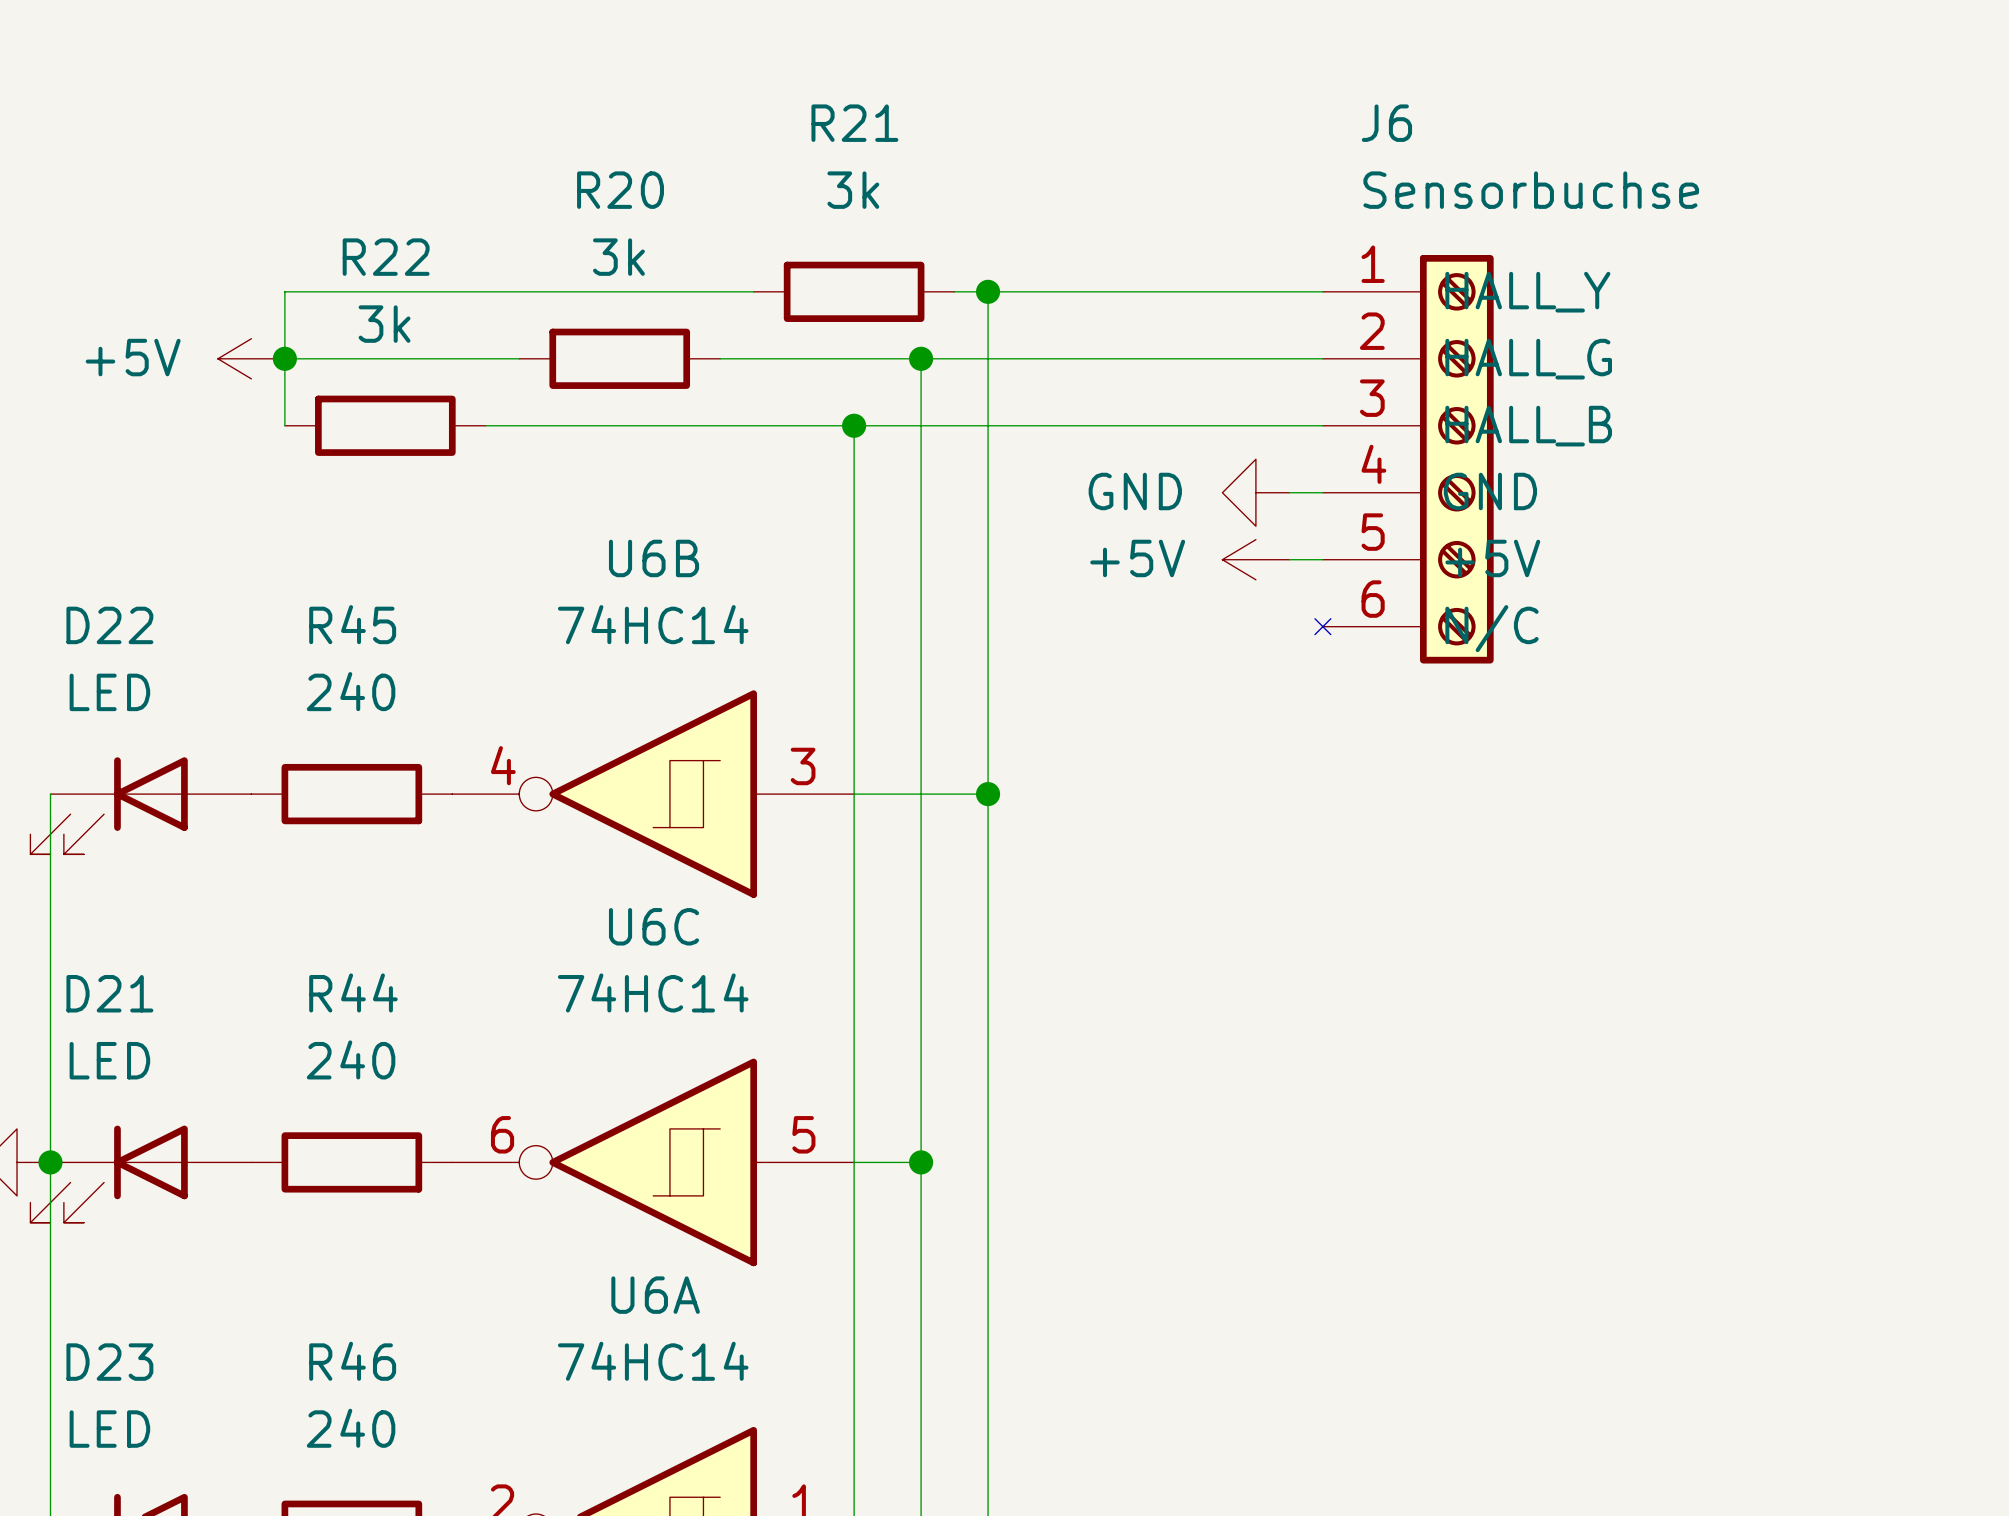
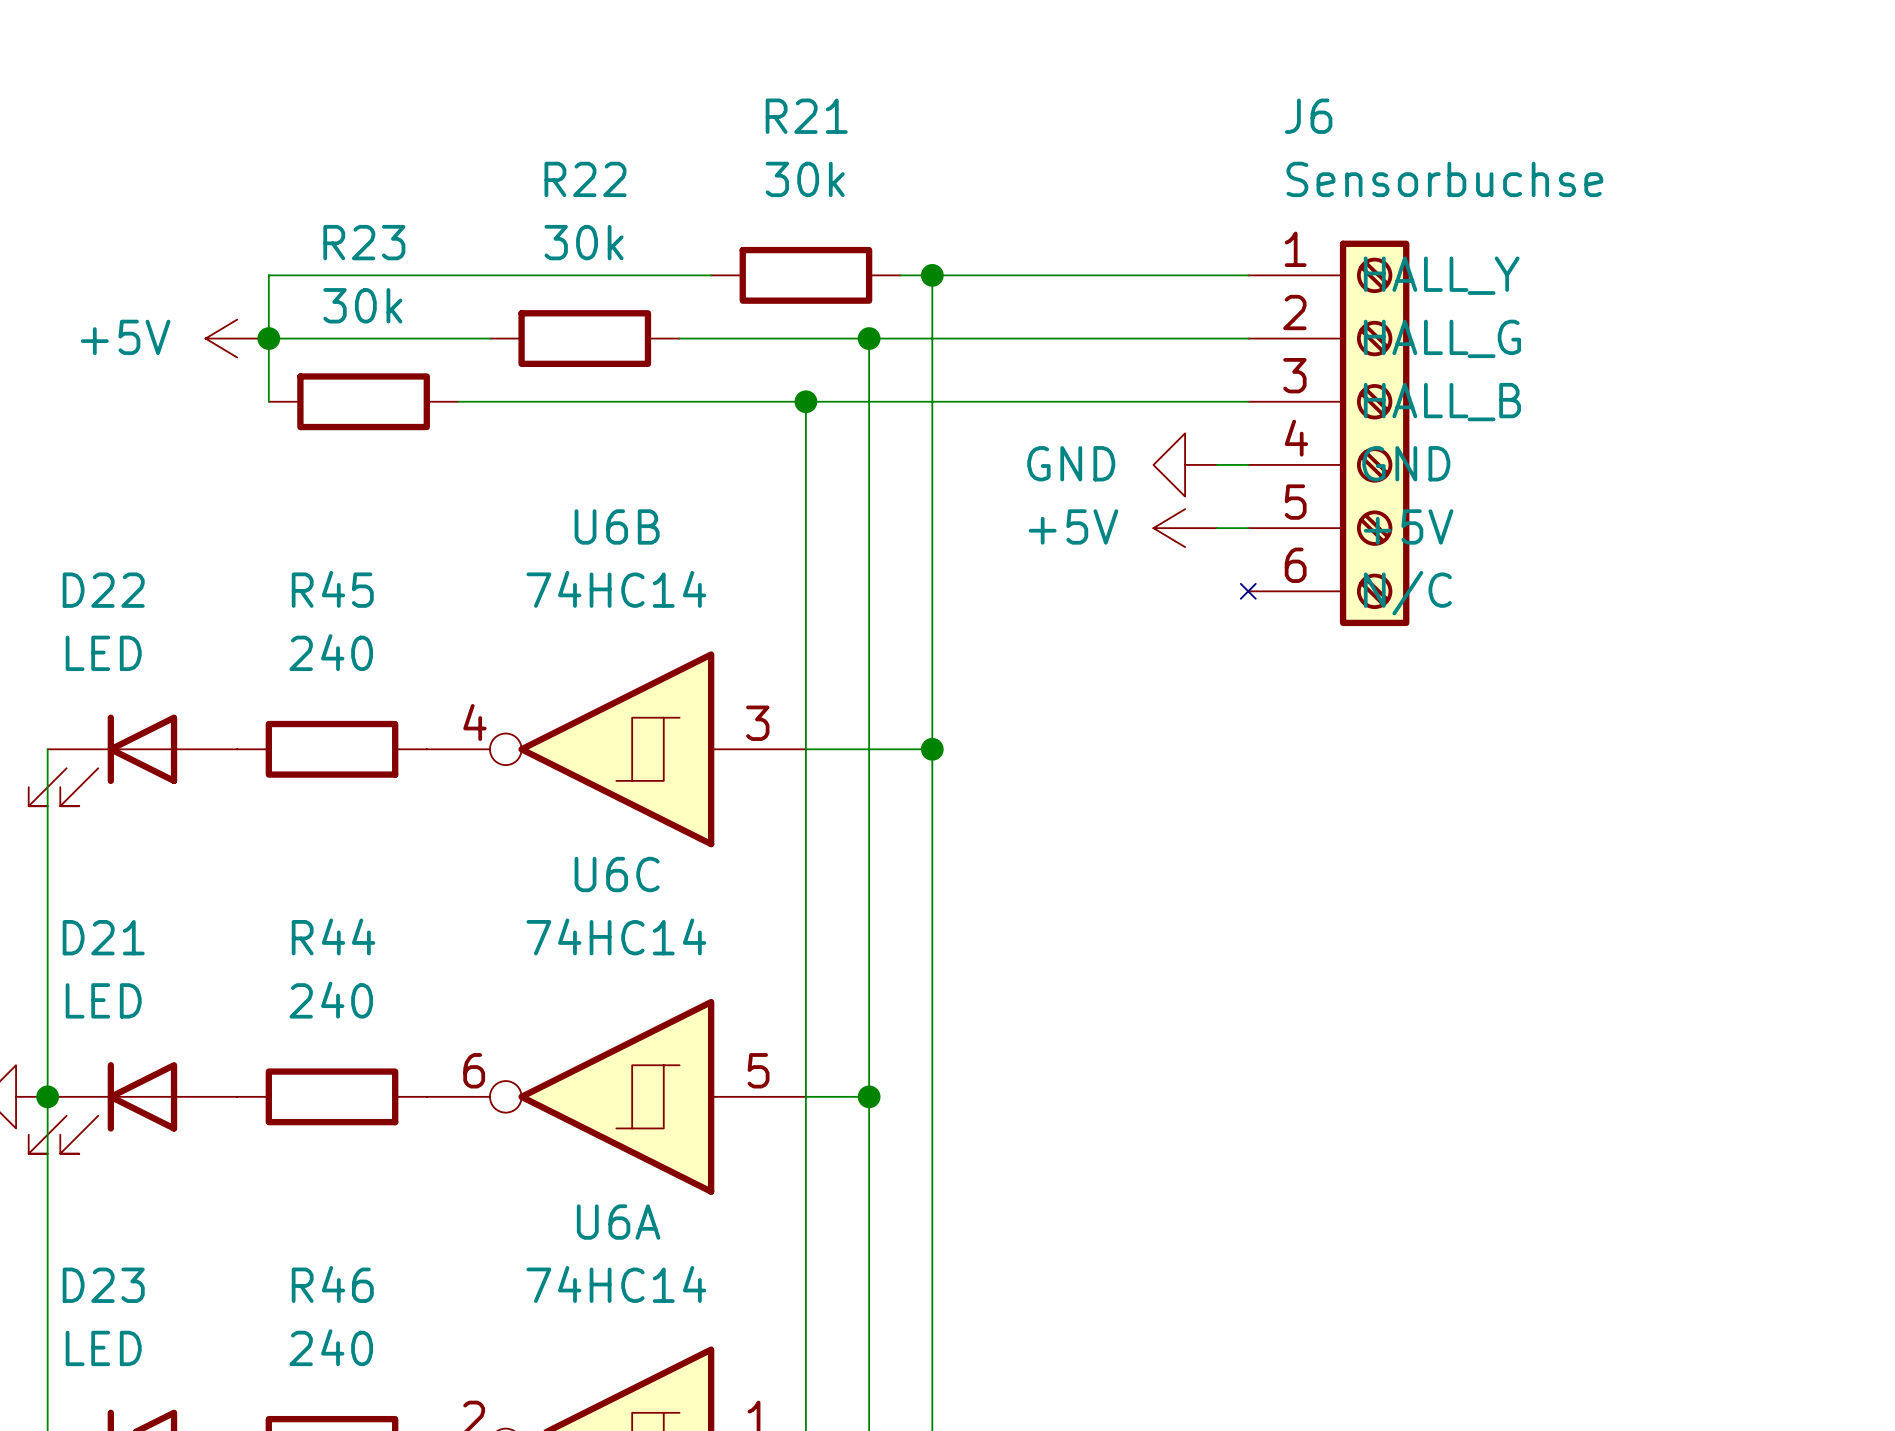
R20 name: R20 (620, 190) -> R22 (585, 179)
R21 value: 3k (853, 190) -> 30k (805, 179)
R22 name: R22 (386, 257) -> R23 (364, 242)
R20 value: 3k (618, 257) -> 30k (584, 242)
R22 value: 3k (384, 324) -> 30k (362, 305)

